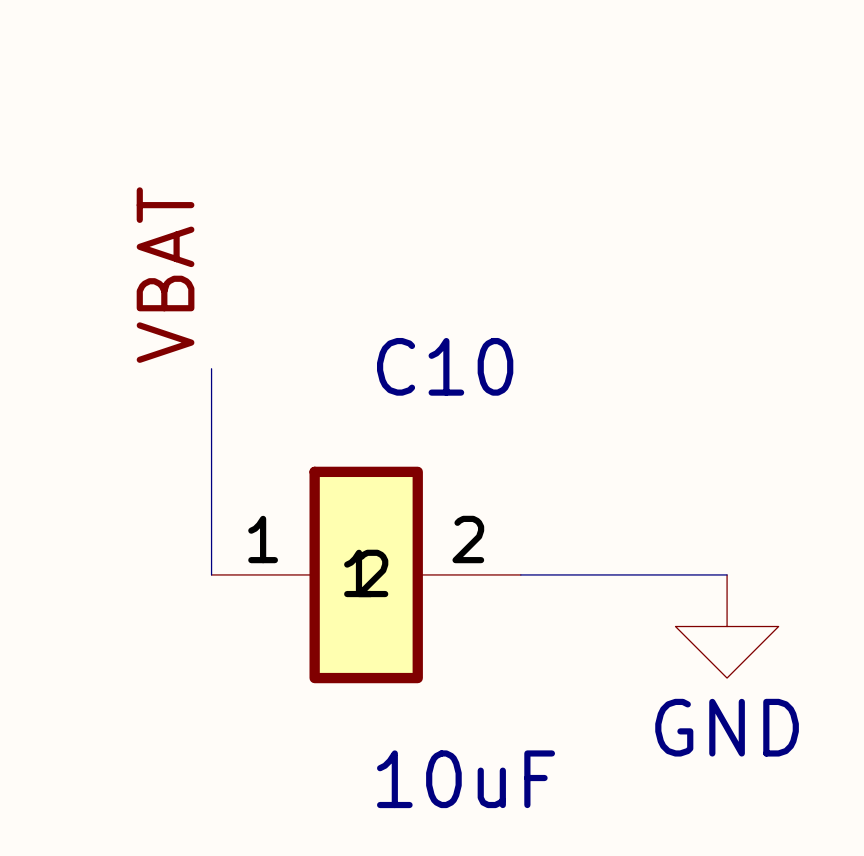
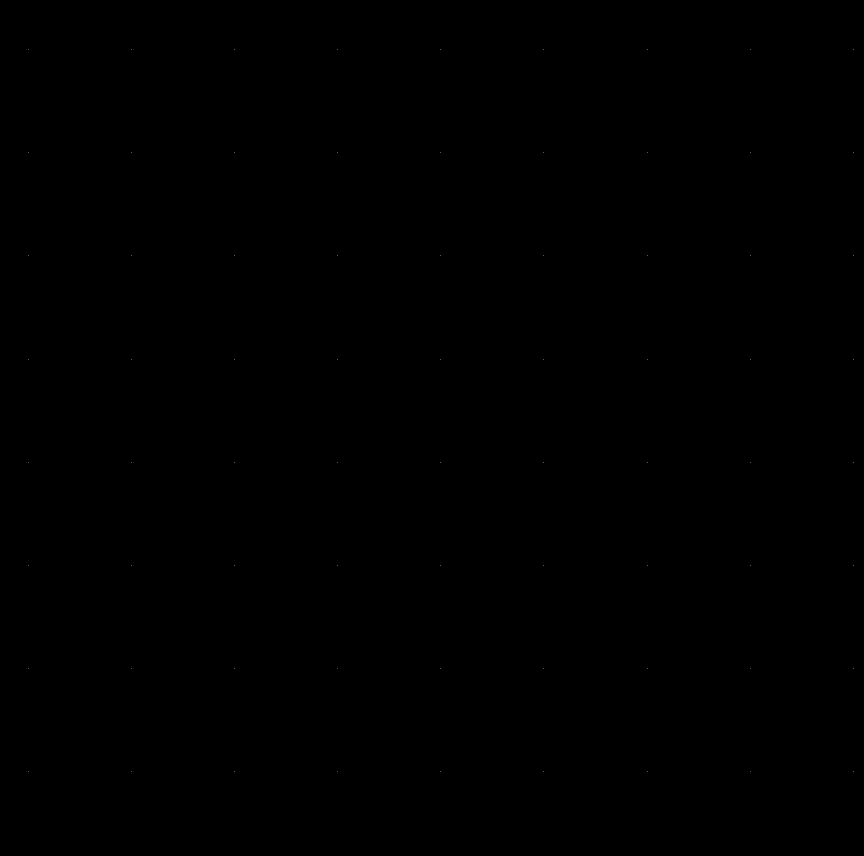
label: VBAT (165, 275) -> none
wire: (211, 368) (211, 574) -> none
C10: 10uF (366, 574) -> none
wire: (520, 574) (727, 574) -> none
power symbol: GND (727, 626) -> none

